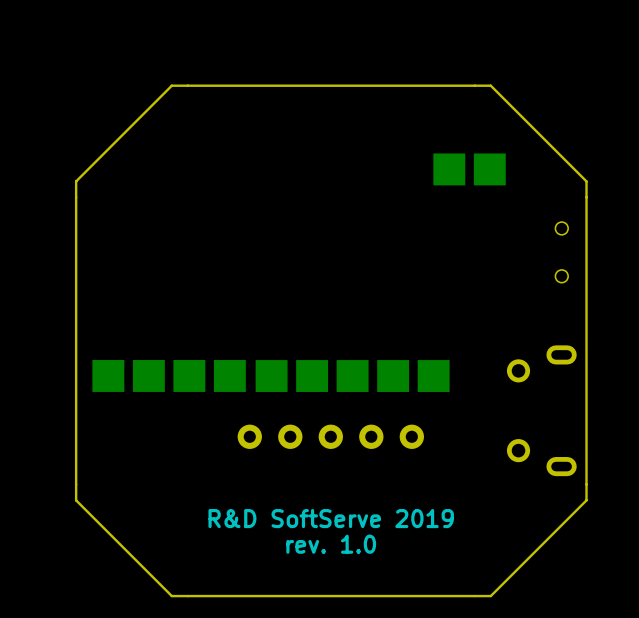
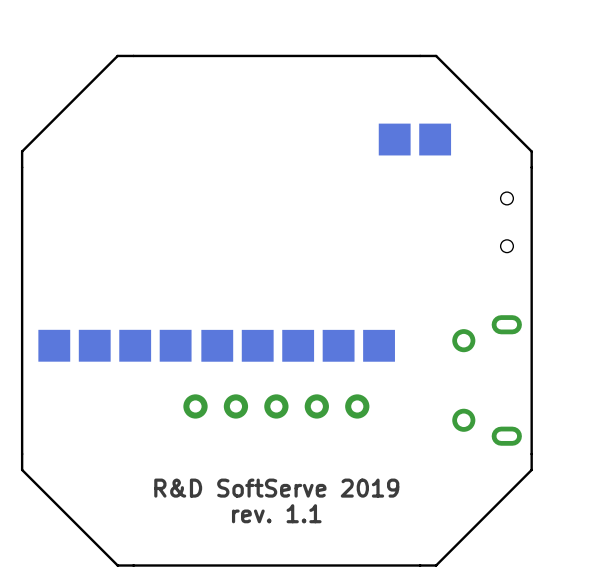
text: rev. 1.0 (331, 544) -> rev. 1.1 (276, 513)

